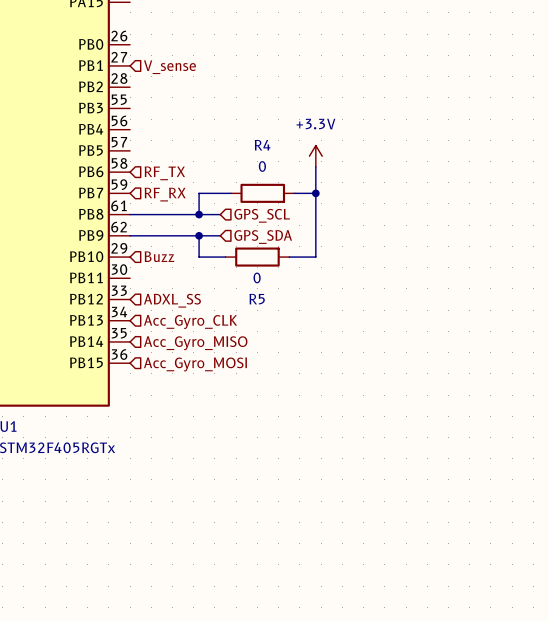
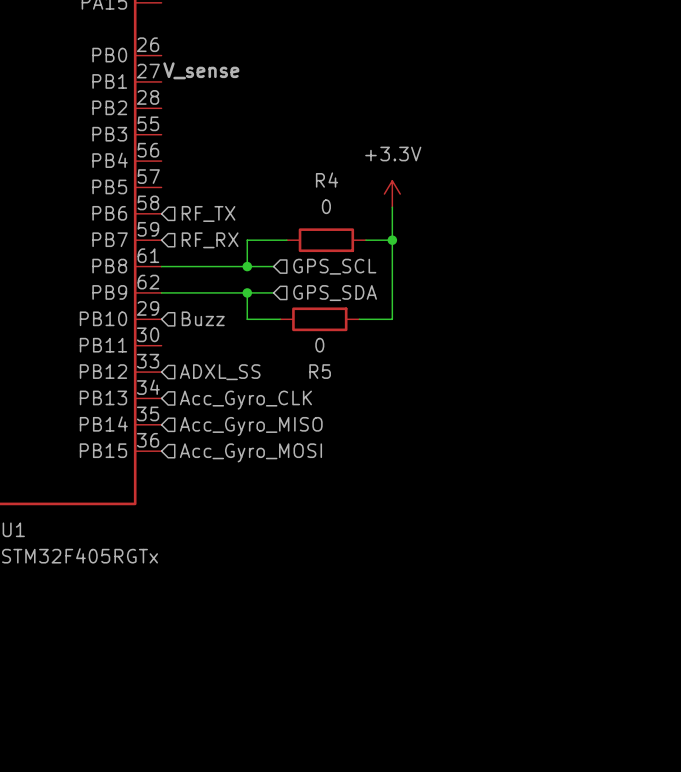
label: none -> V_sense (201, 70)
hierarchical label: V_sense (169, 67) -> none

